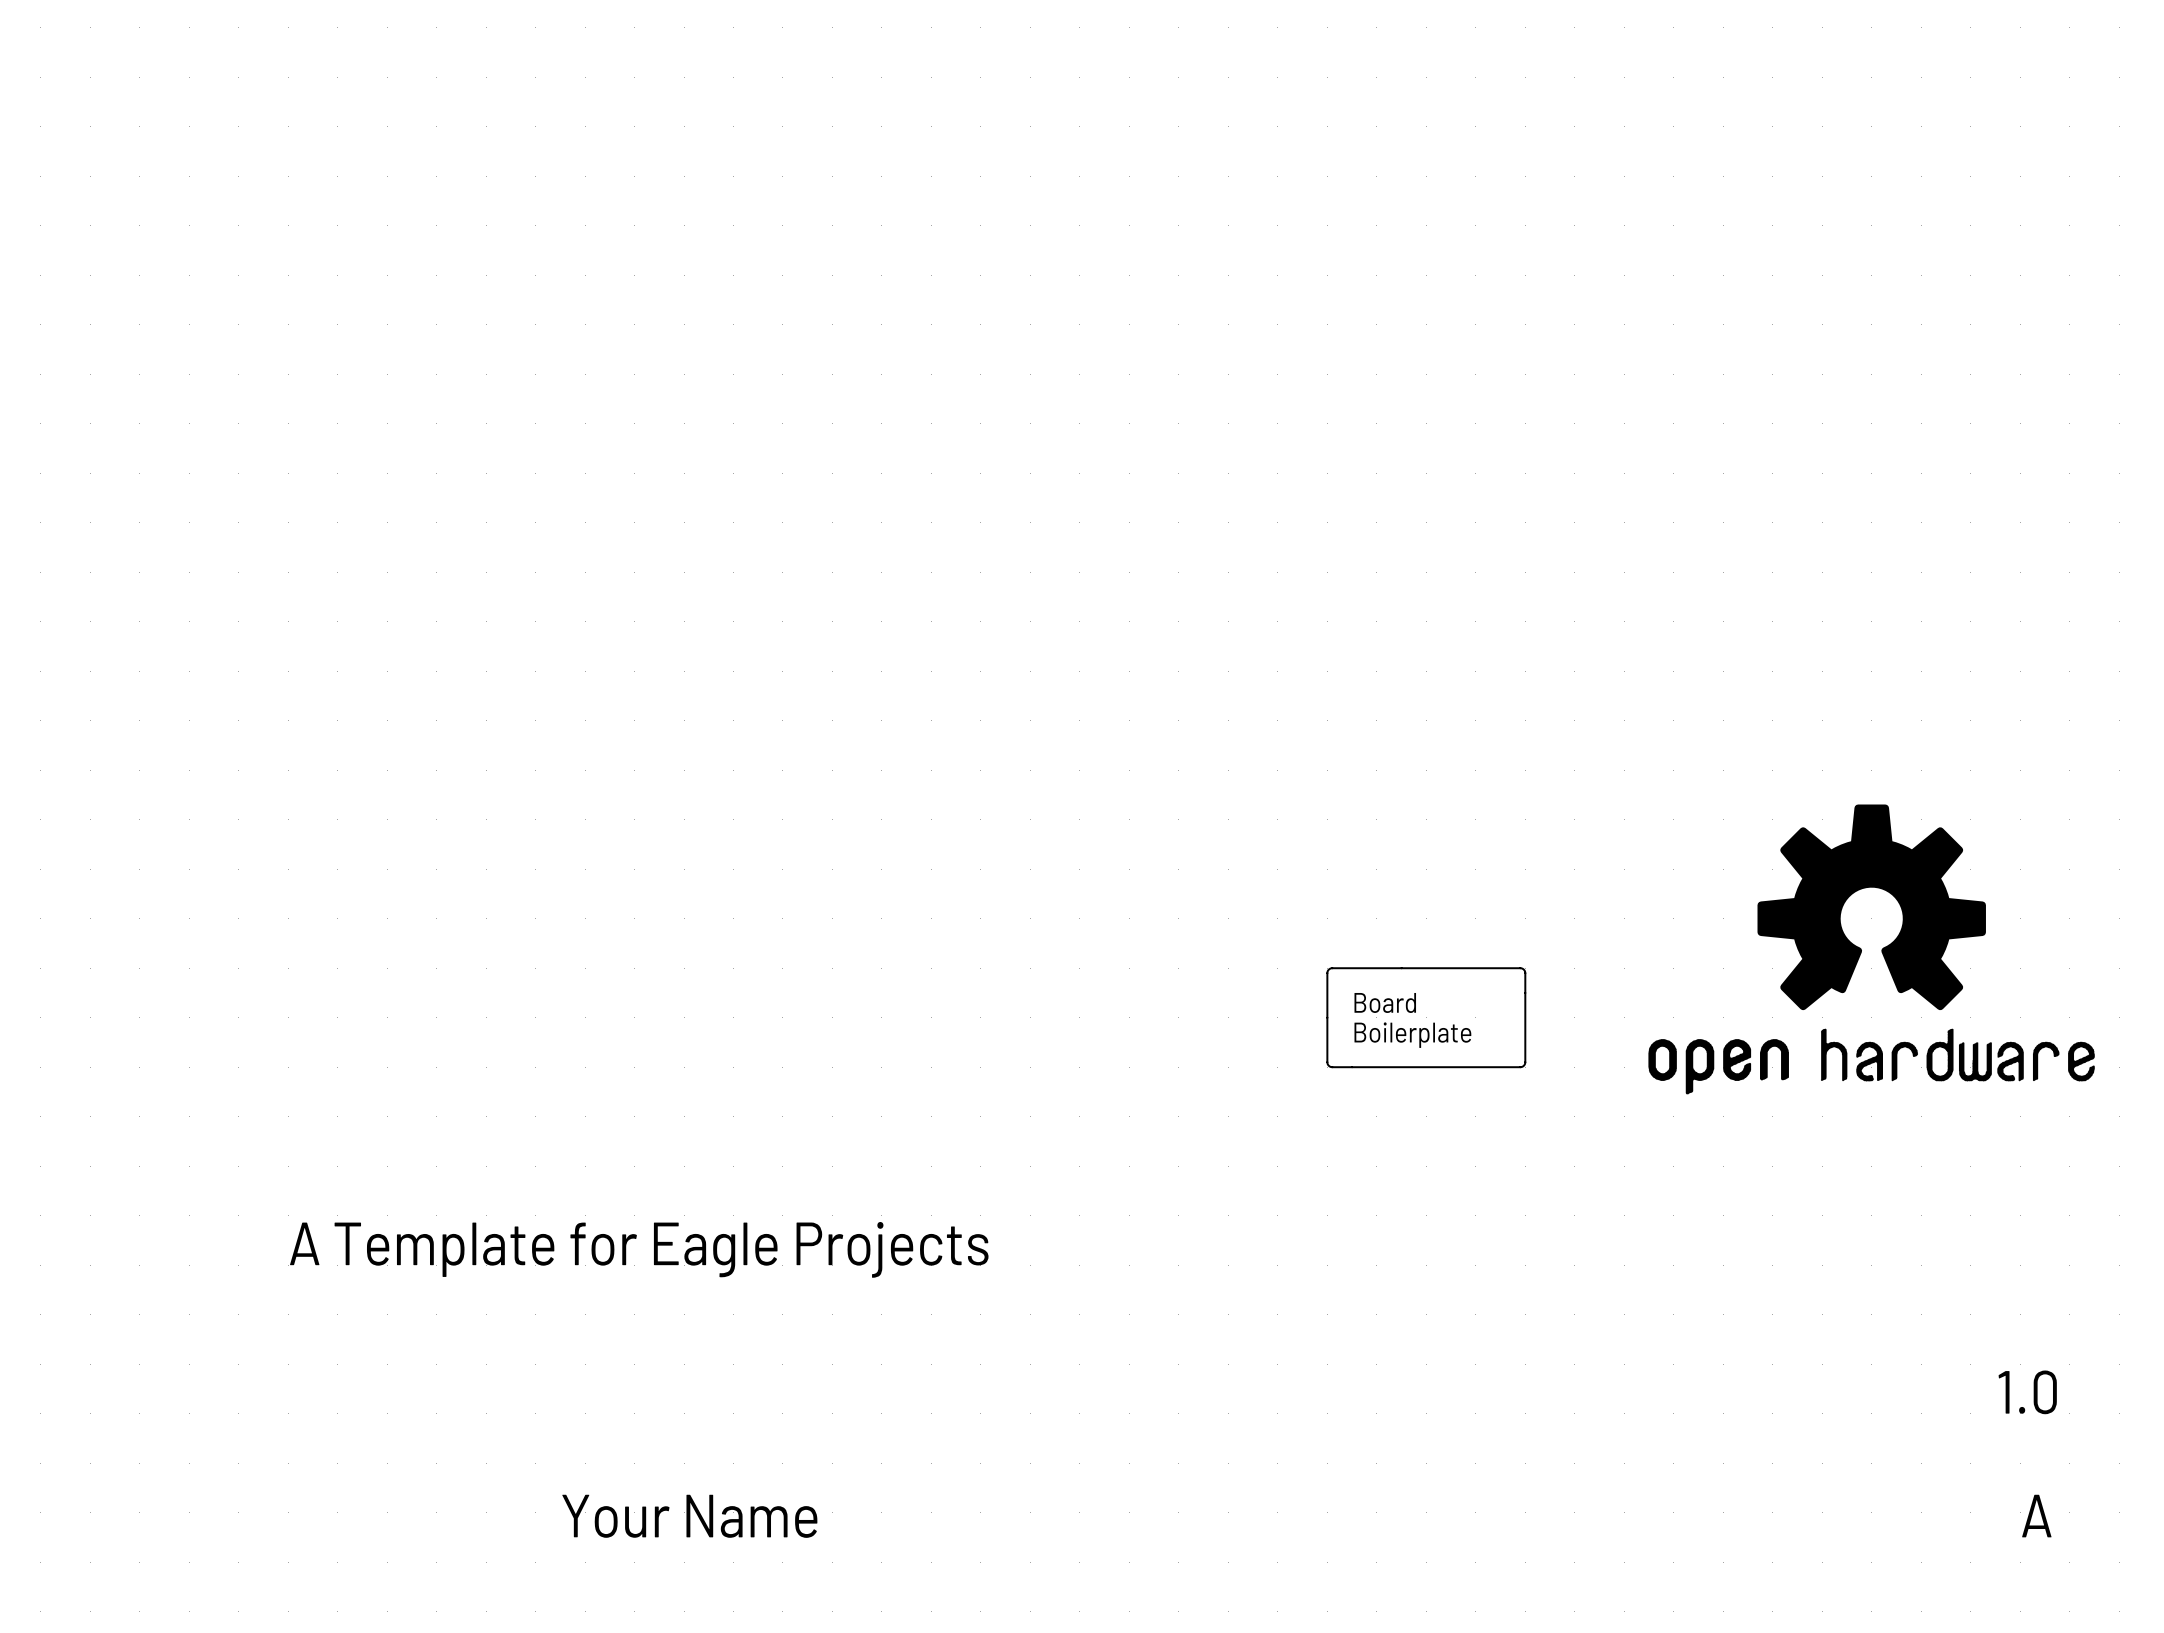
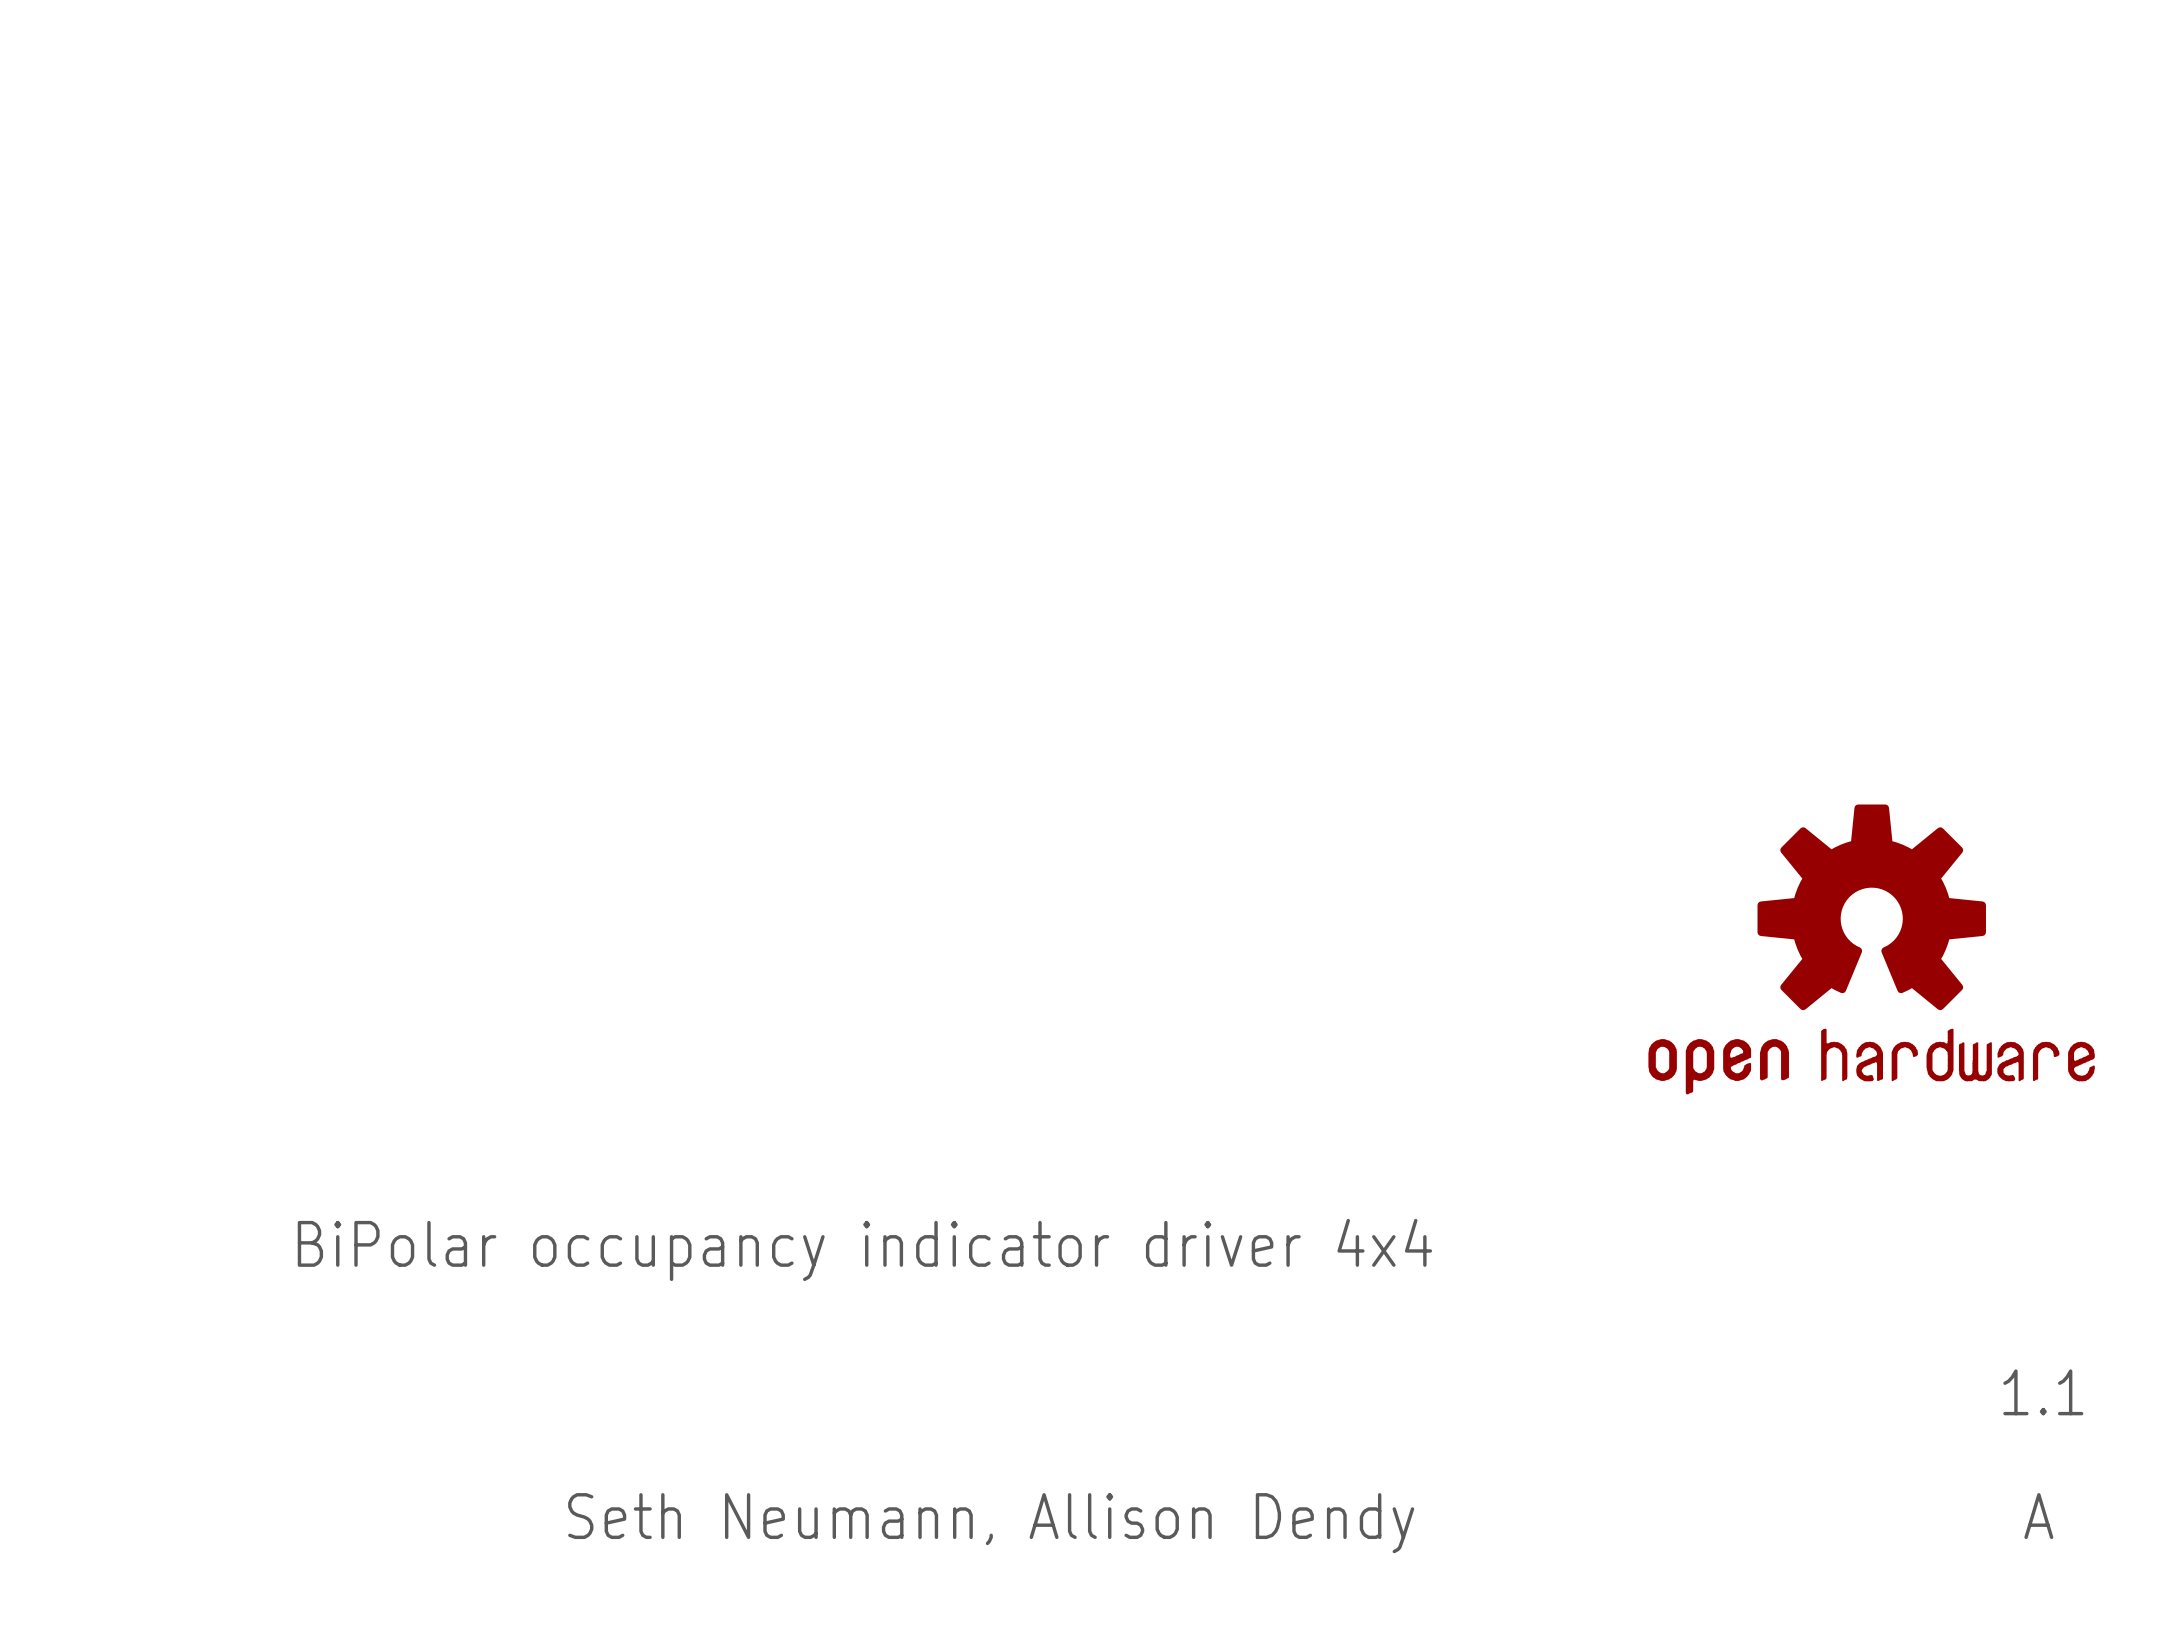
part: (1426, 1017) -> none
text: A Template for Eagle Projects (639, 1249) -> BiPolar occupancy indicator driver 4x4 (864, 1249)
text: 1.0 (2027, 1392) -> 1.1 (2043, 1392)
text: Your Name (689, 1516) -> Seth Neumann, Allison Dendy (991, 1523)

